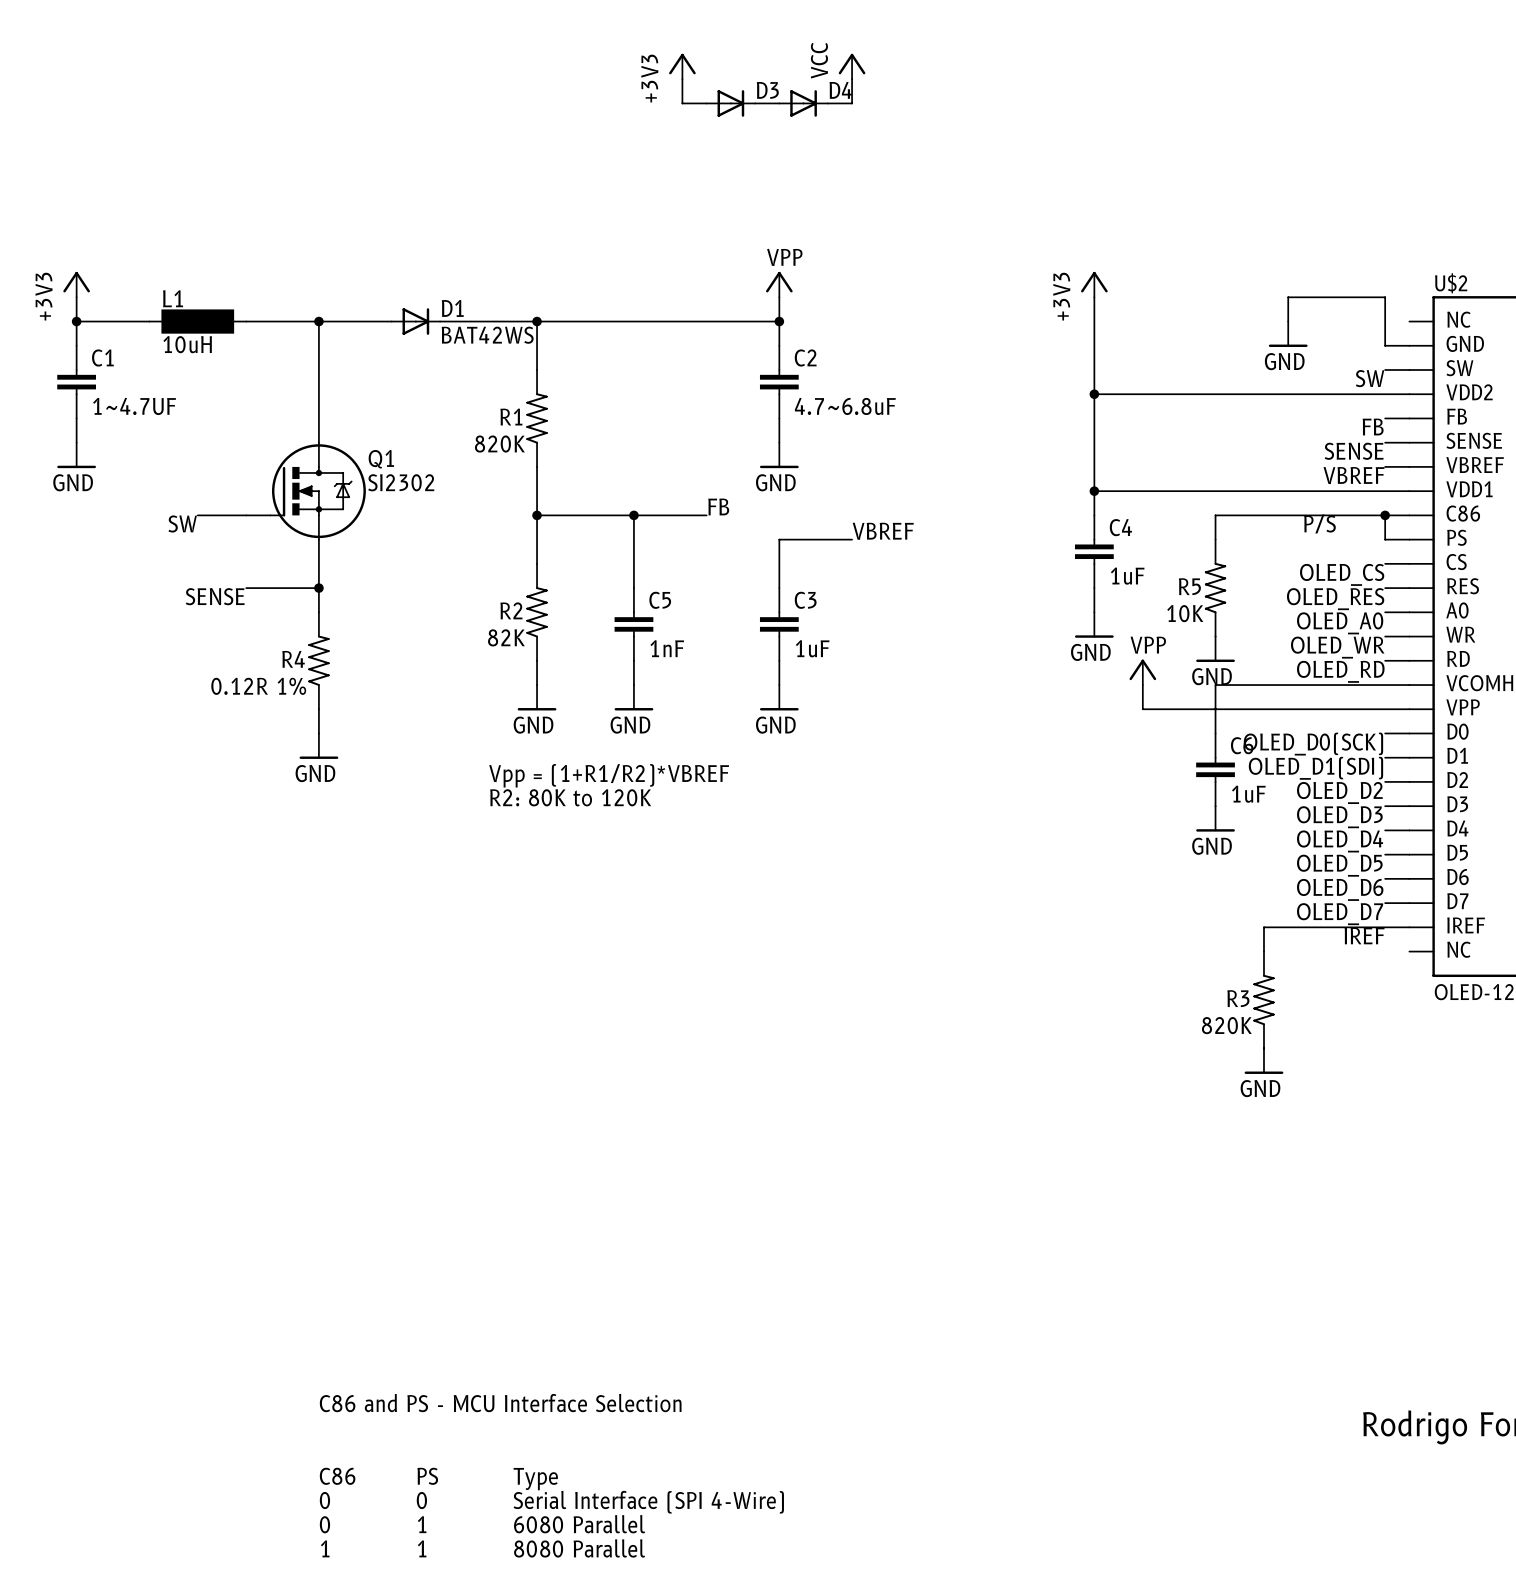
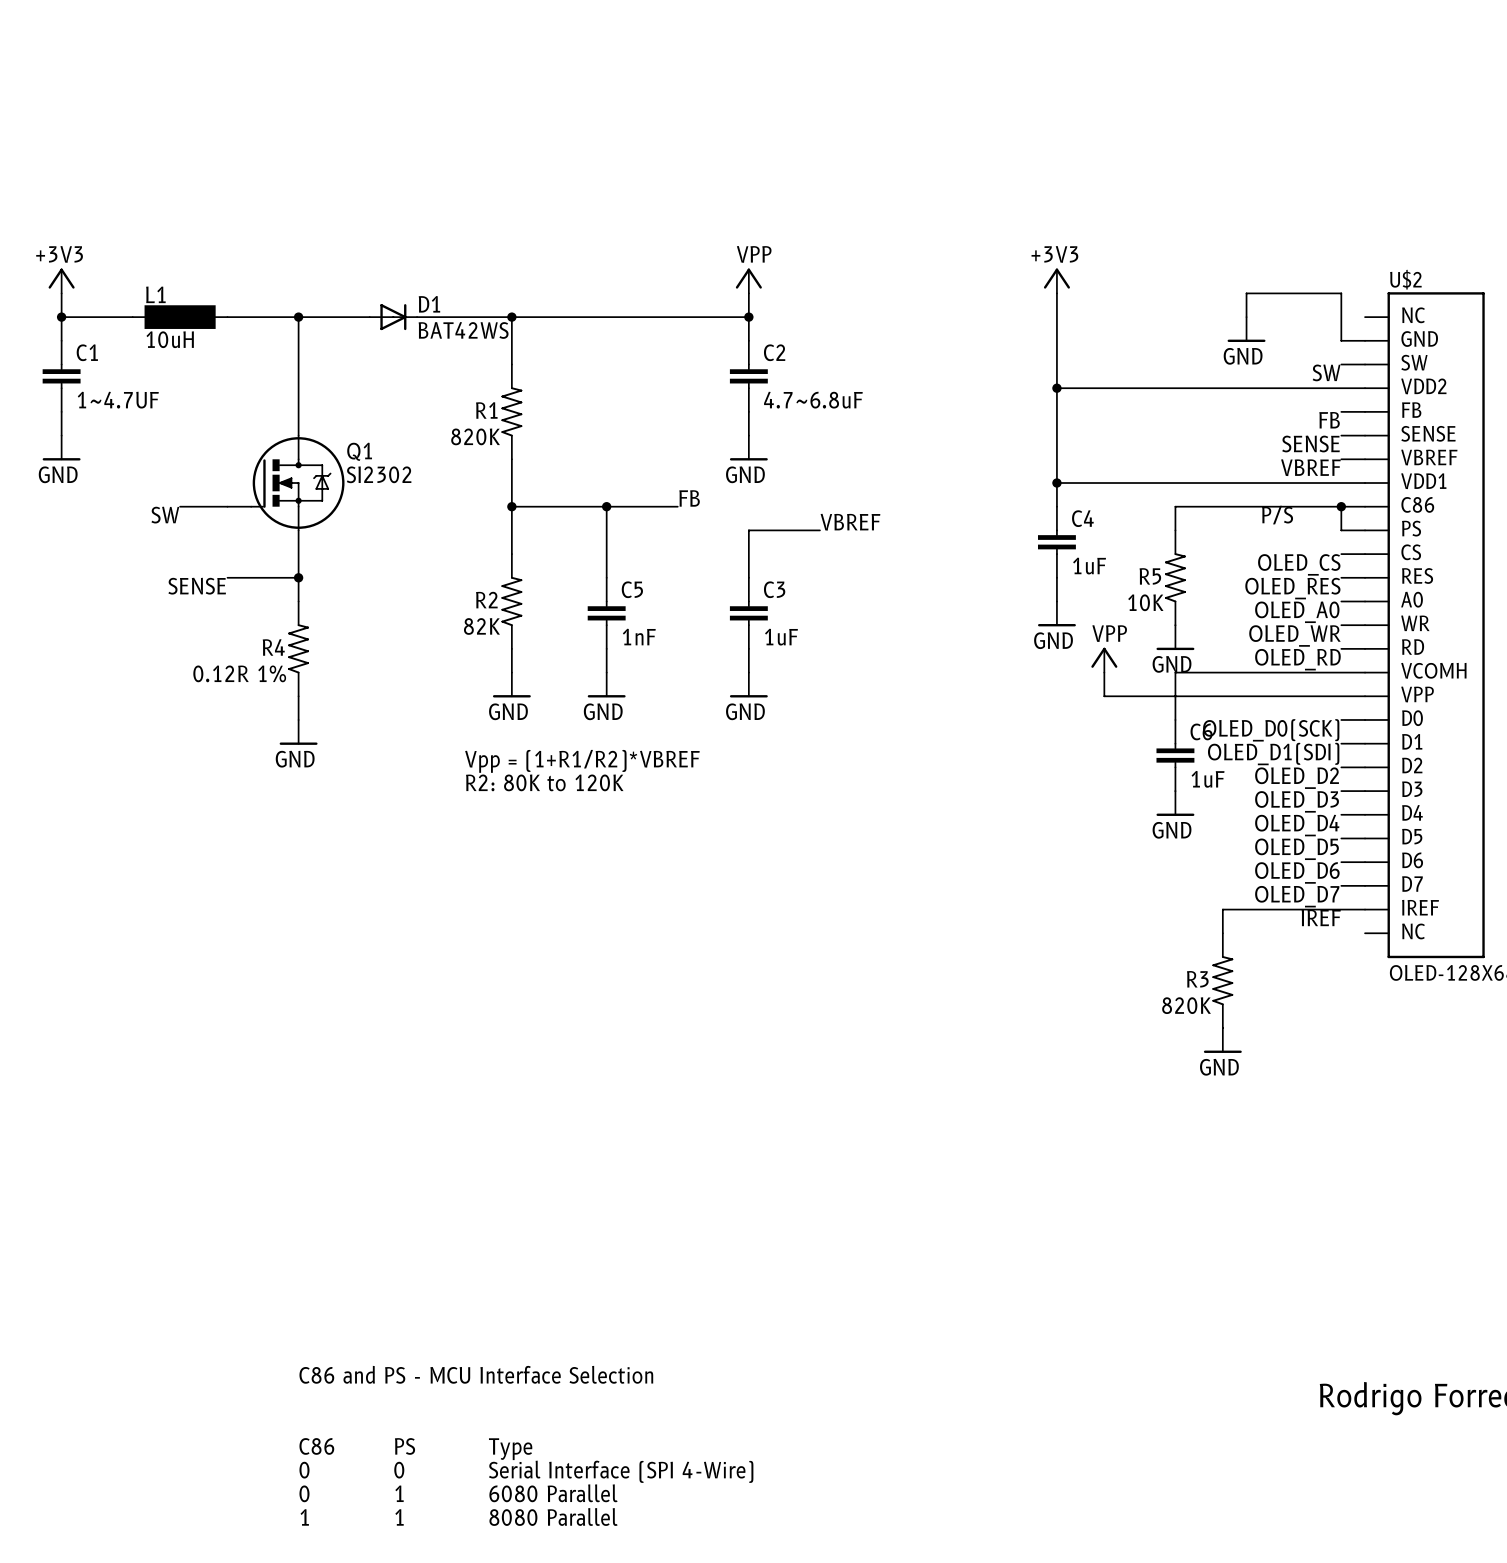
power symbol: +3V3 (682, 66) -> none
power symbol: VCC (852, 66) -> none
wire: (682, 79) (682, 103) (706, 103) -> none
wire: (852, 79) (852, 103) (827, 103) -> none
D3: (730, 103) -> none
wire: (755, 103) (779, 103) -> none
D4: (803, 103) -> none
power symbol text rotation: 0° (44, 296) -> 90° clockwise (59, 254)
power symbol text rotation: 0° (1061, 296) -> 90° clockwise (1054, 254)

